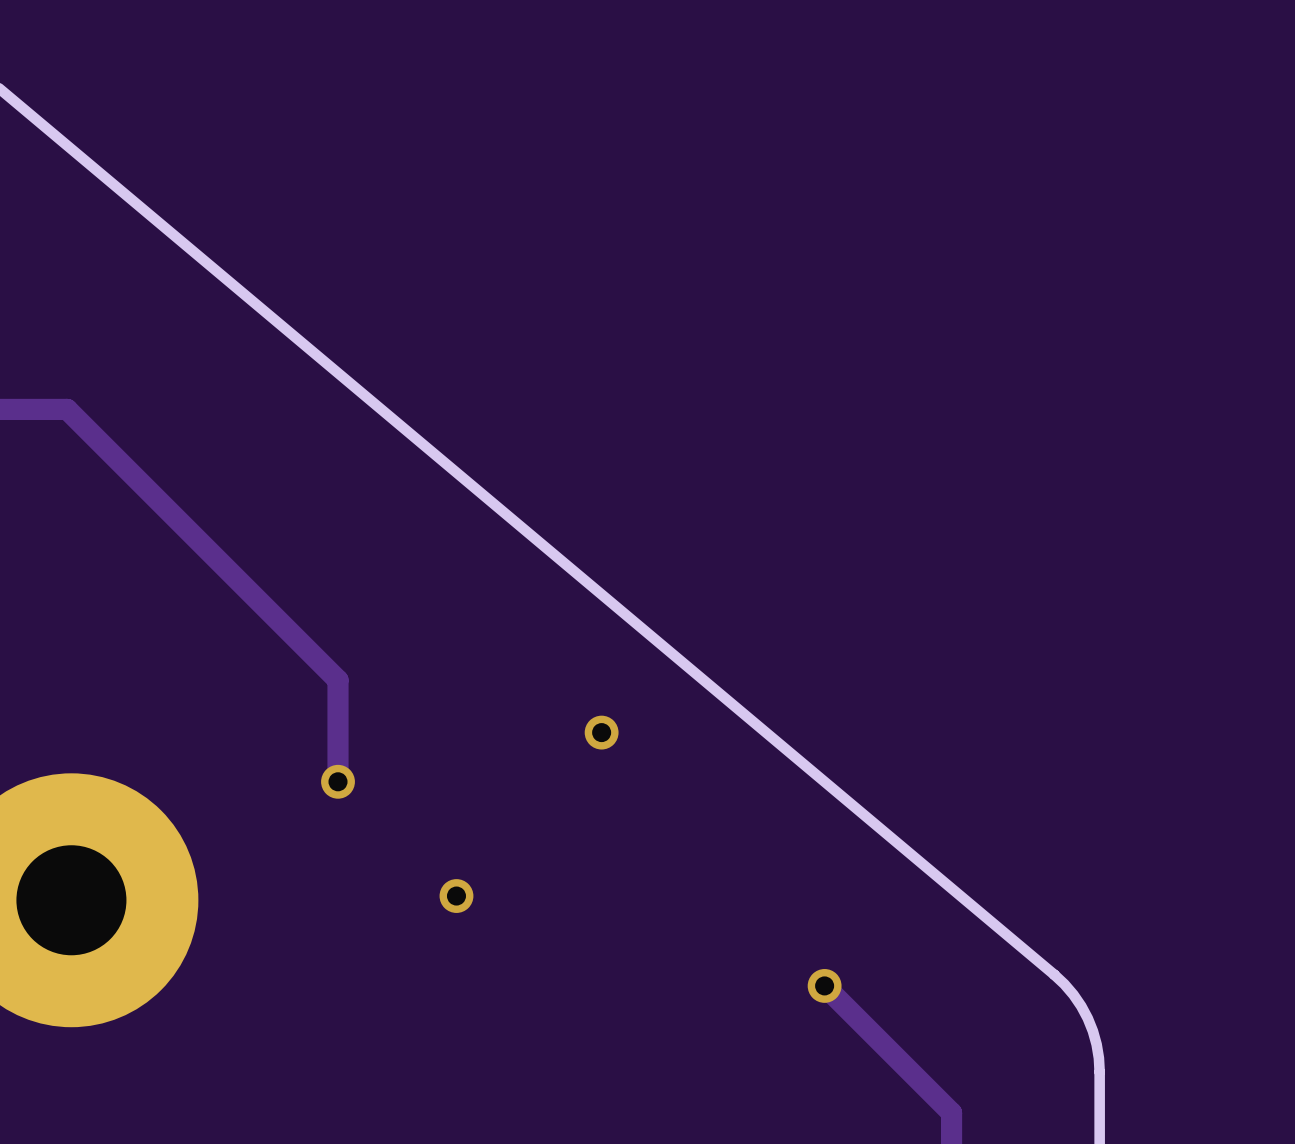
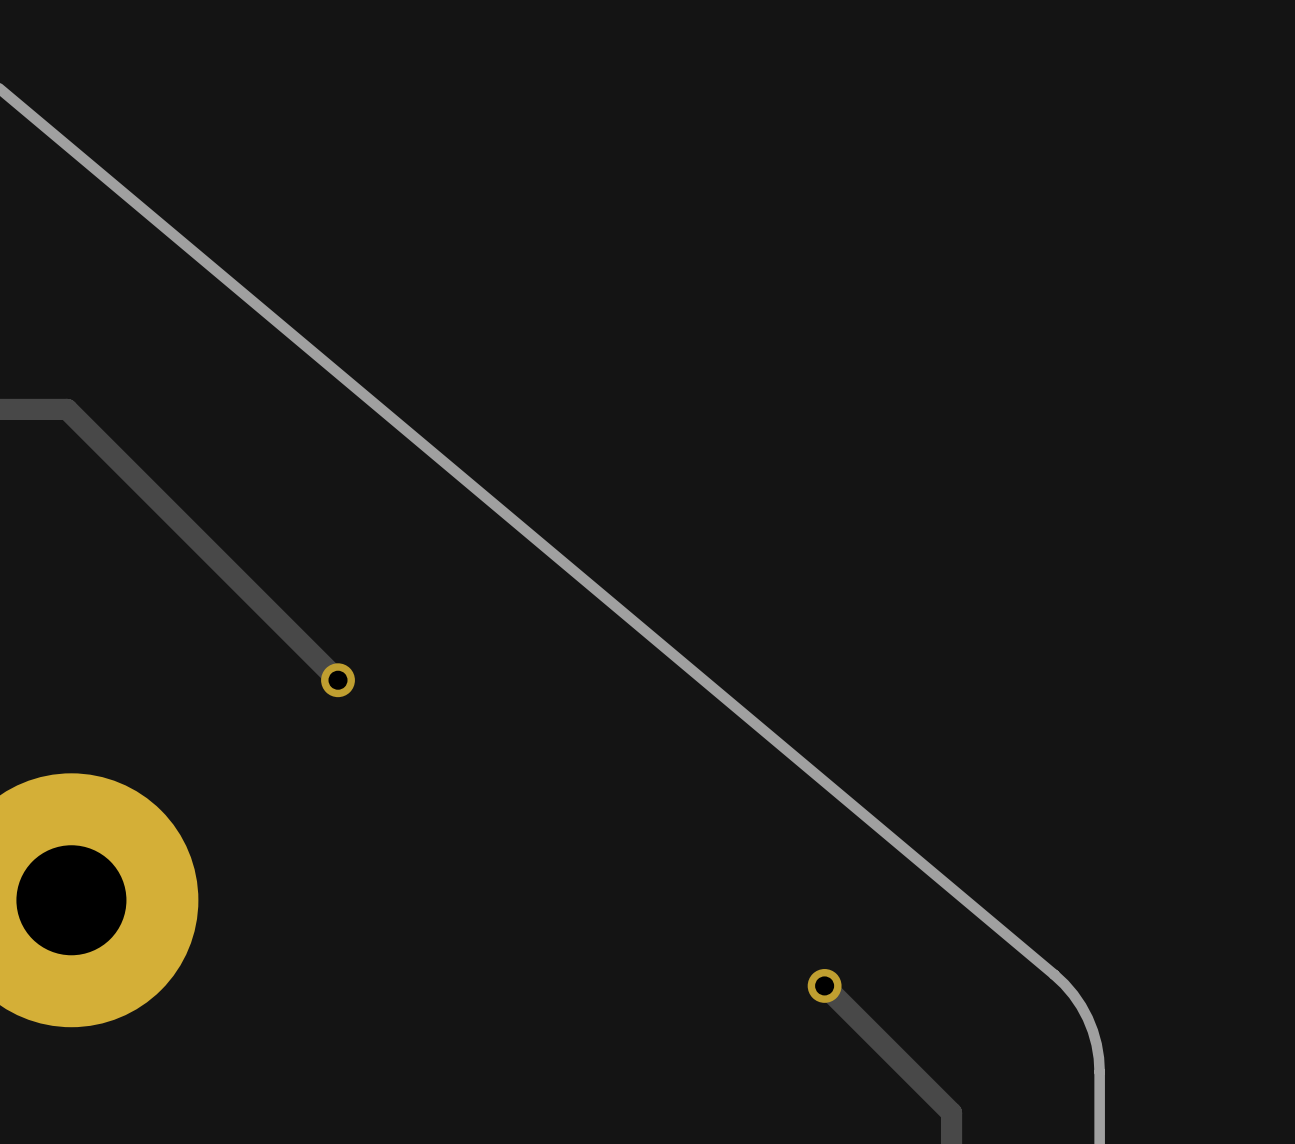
track: (338, 680) (338, 781) -> none
via: (601, 732) -> none
via position: (338, 781) -> (338, 680)
via: (456, 896) -> none

